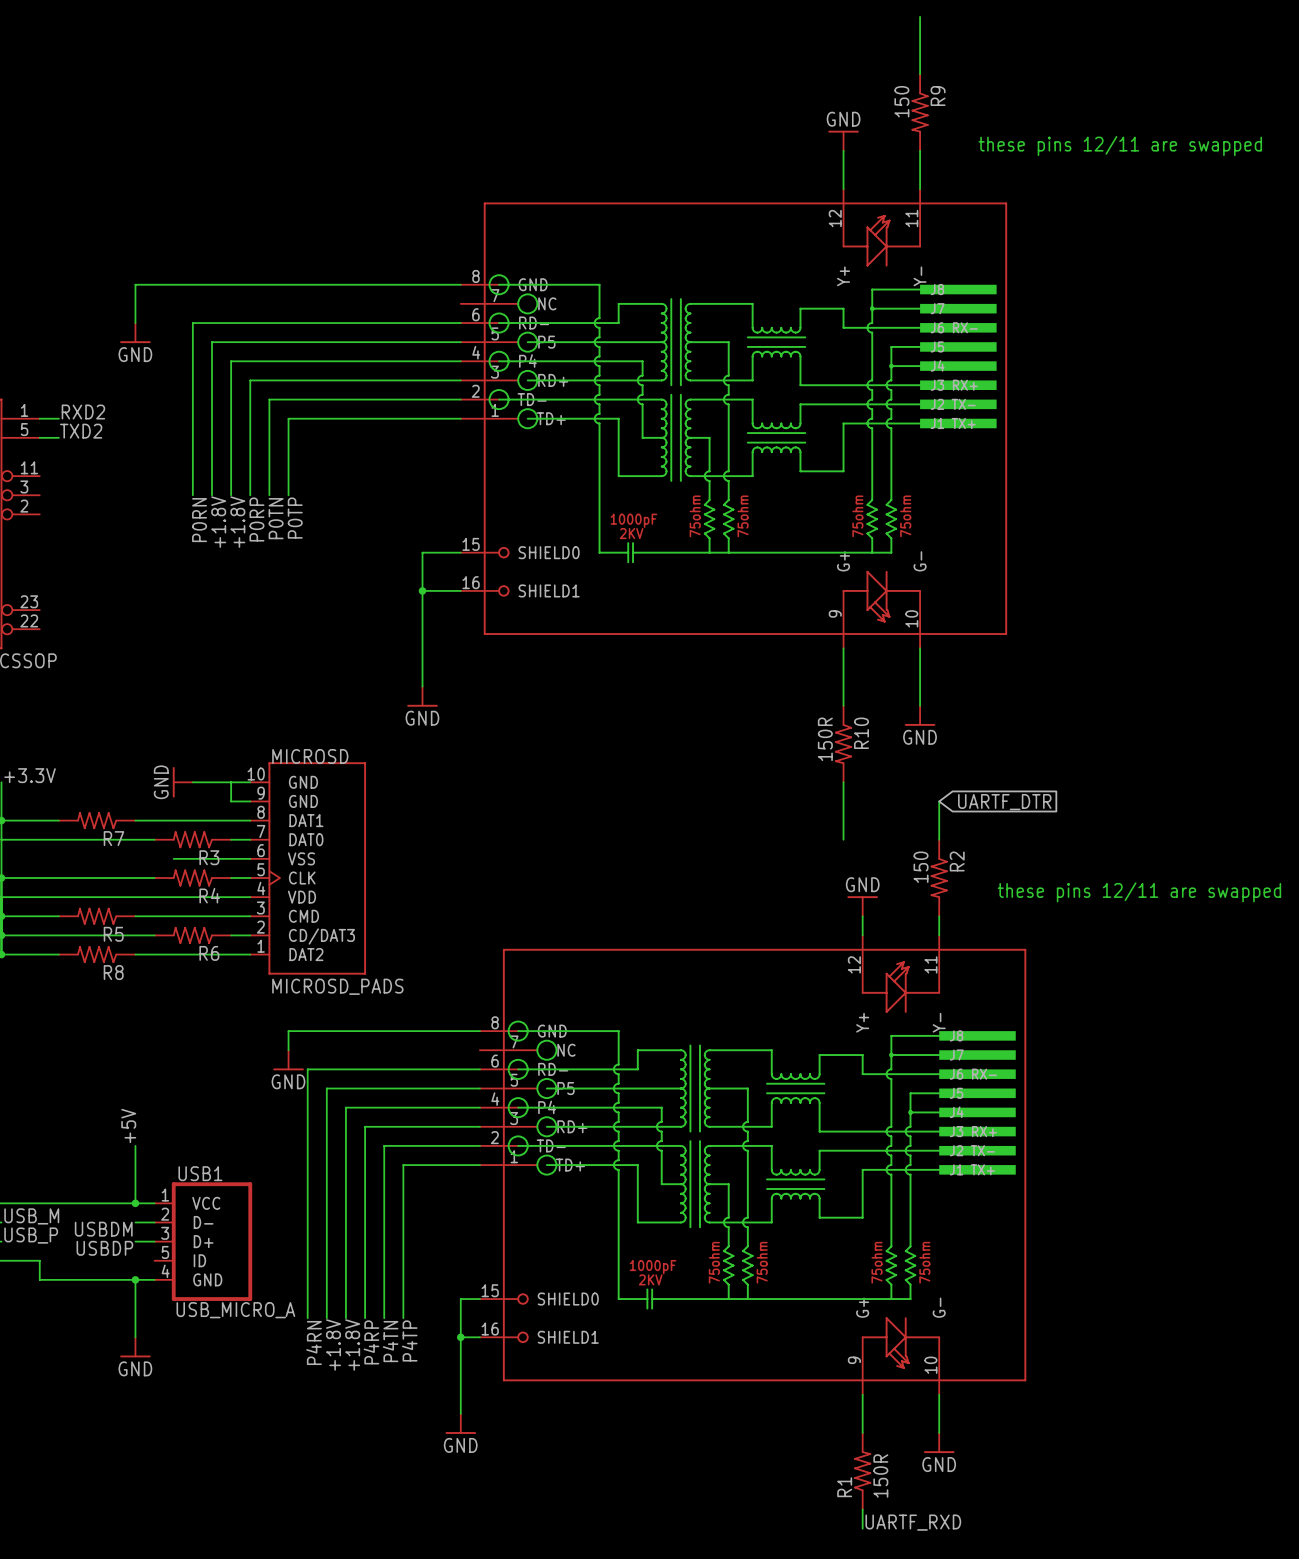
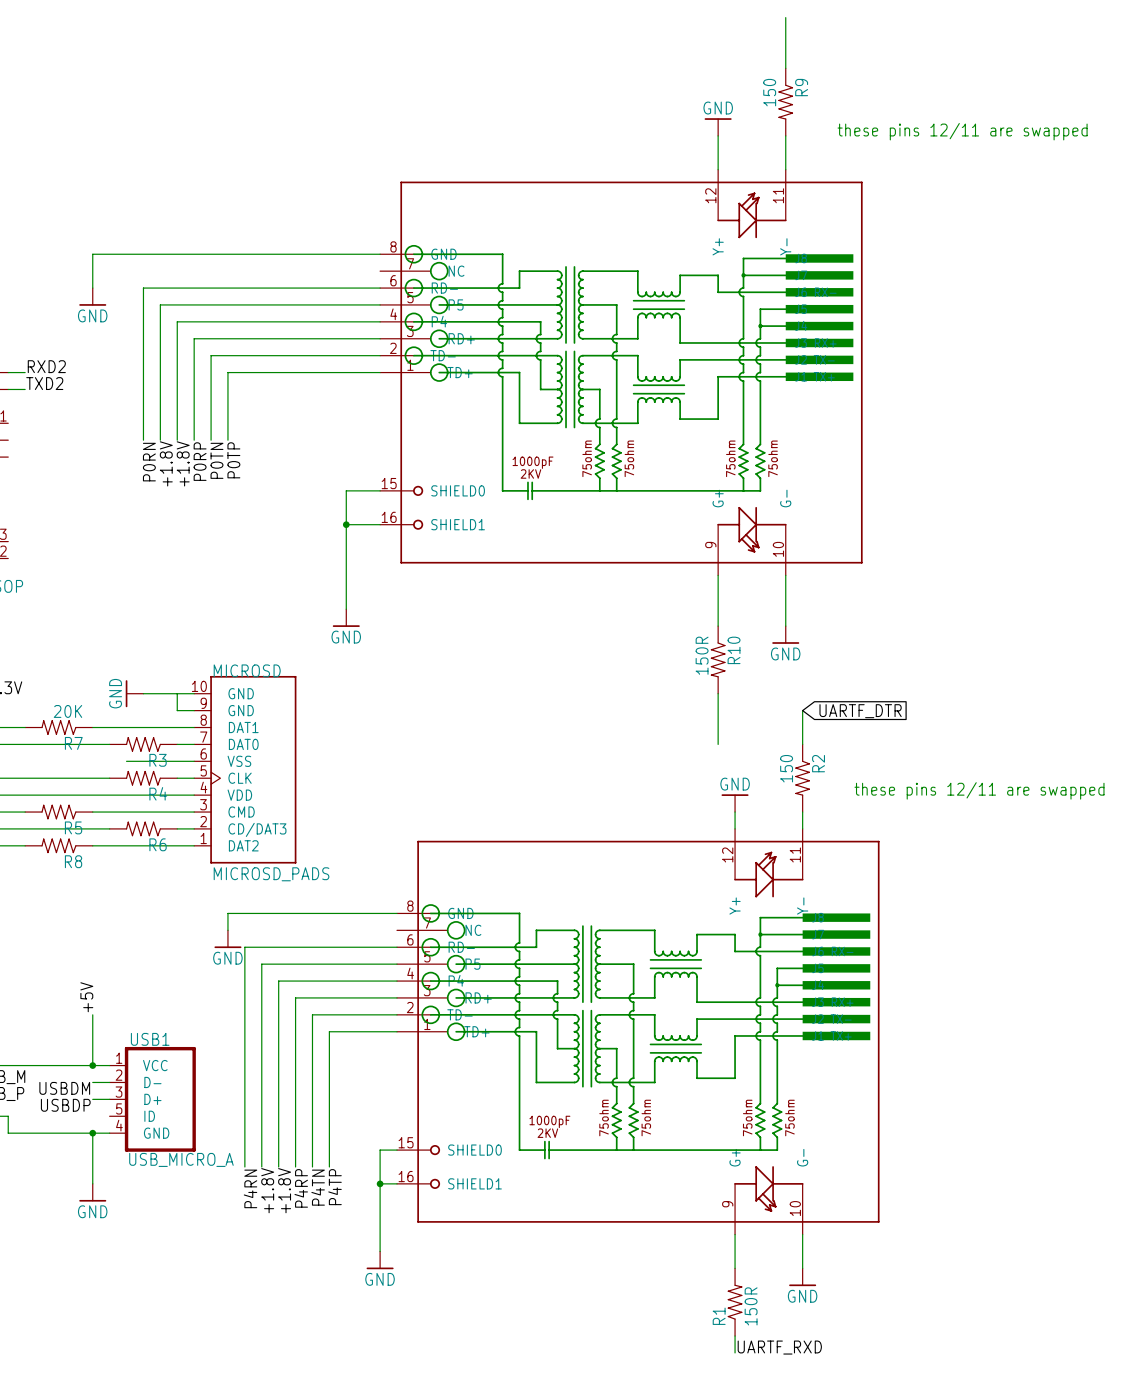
R7 value: none -> 20K (67, 711)

